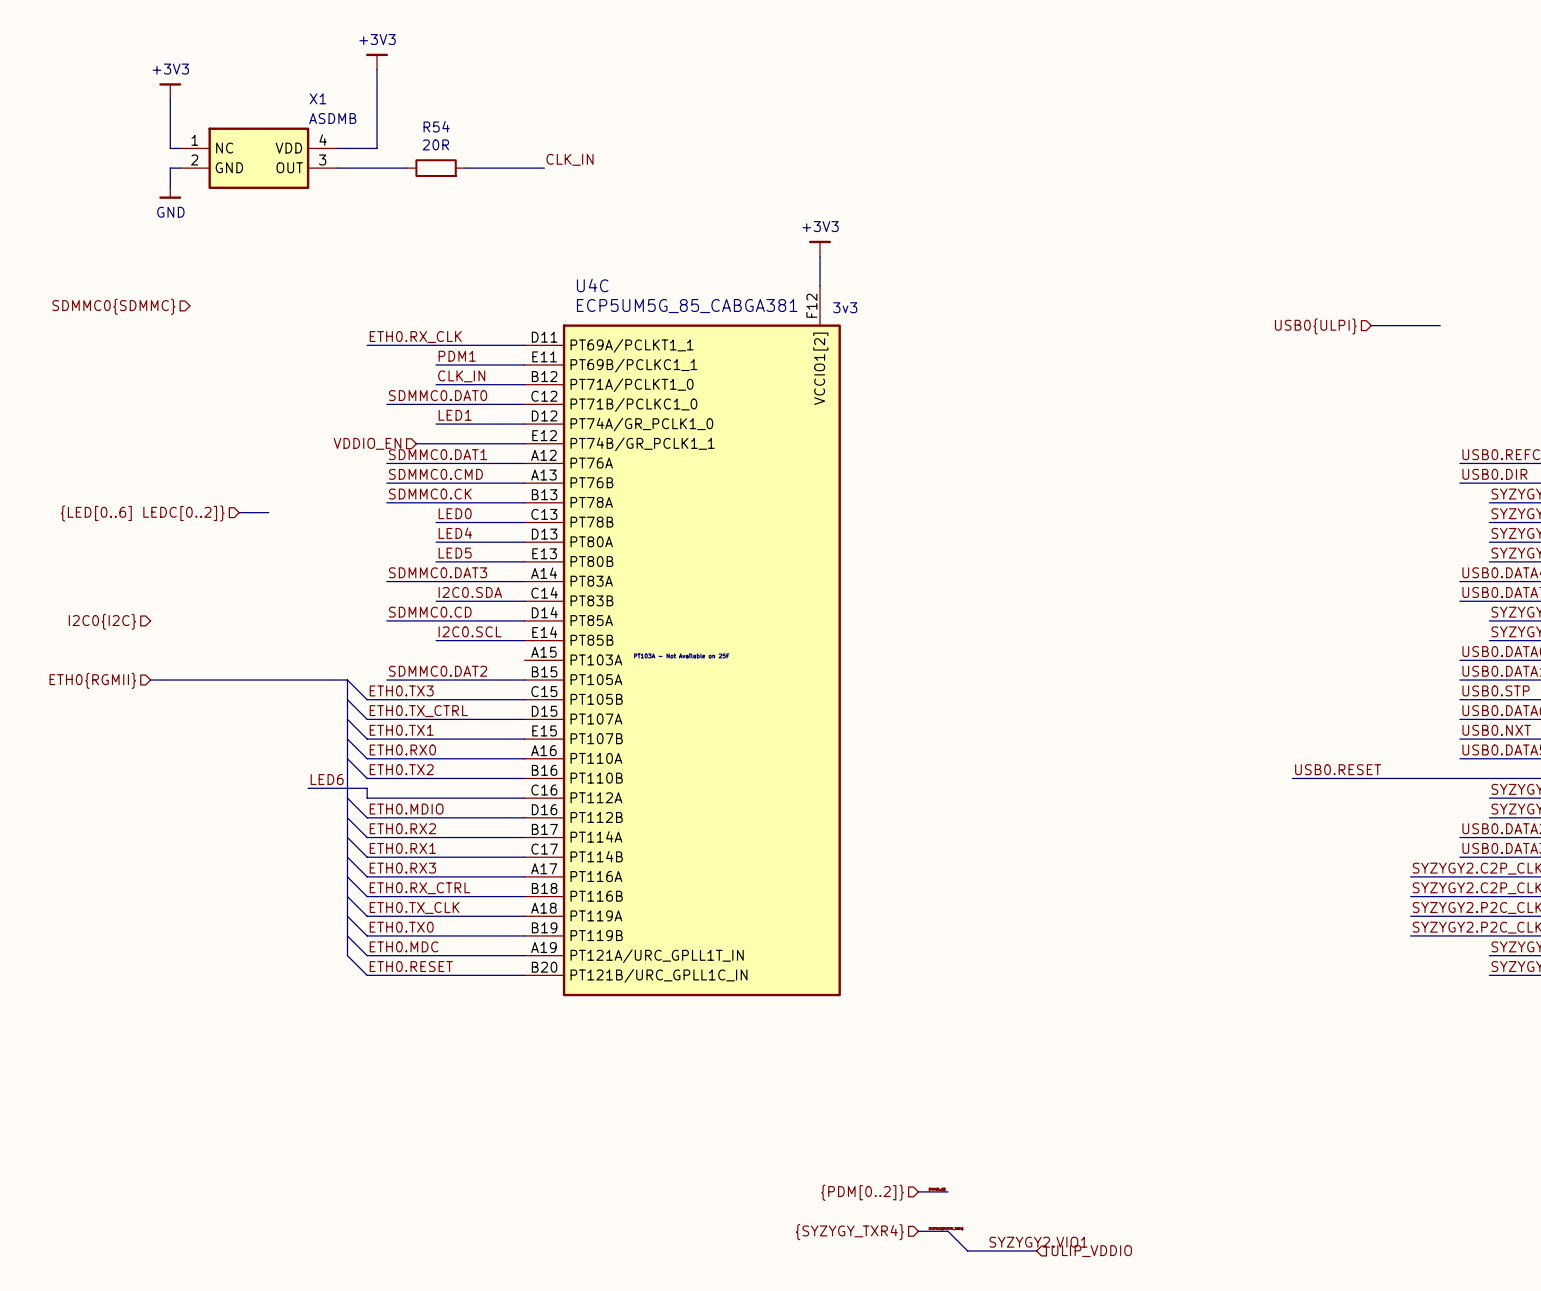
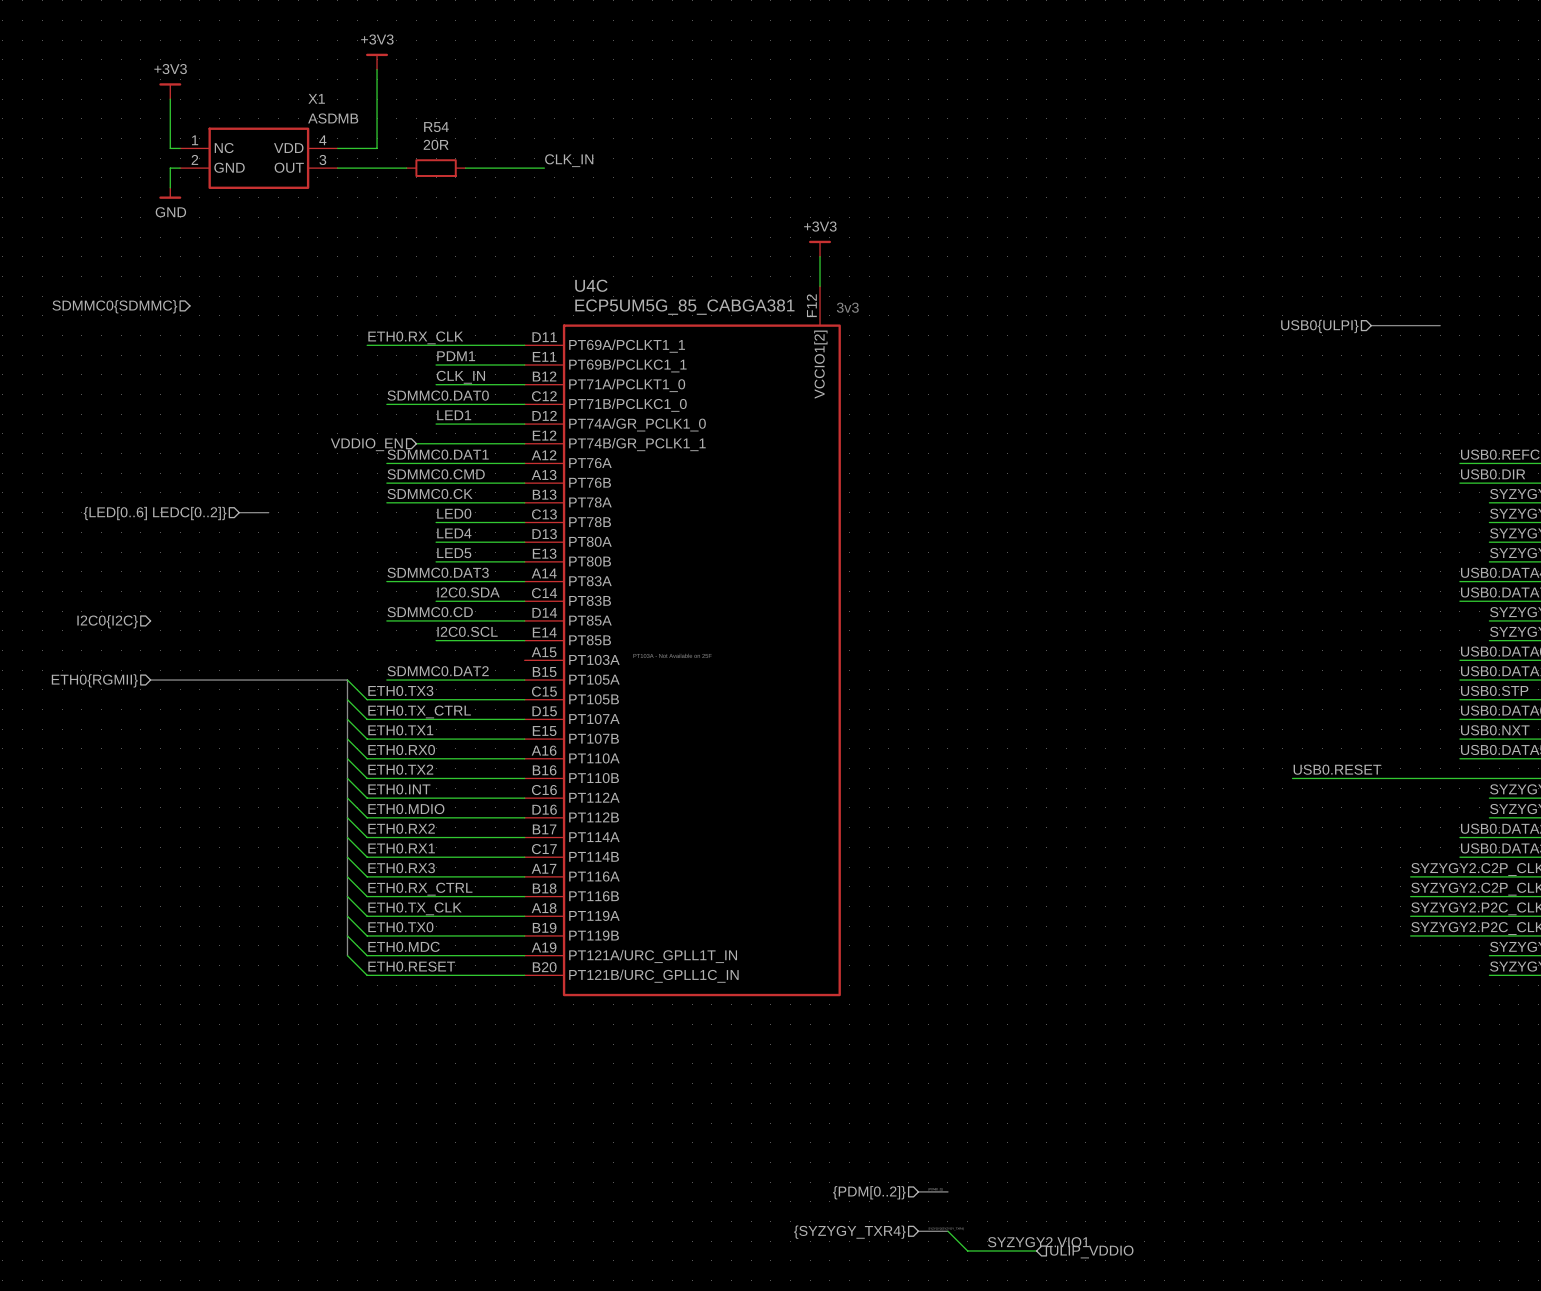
label: LED6 (327, 779) -> none
wire: (308, 788) (367, 788) (367, 798) -> (347, 778) (367, 798)
label: none -> ETH0.INT (399, 789)

